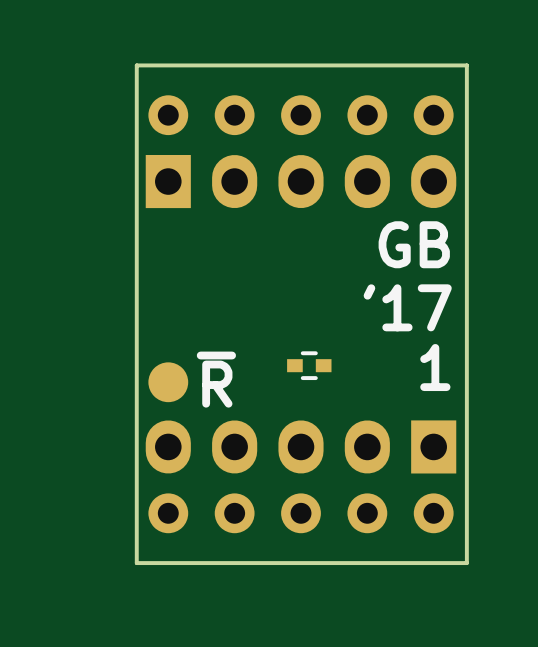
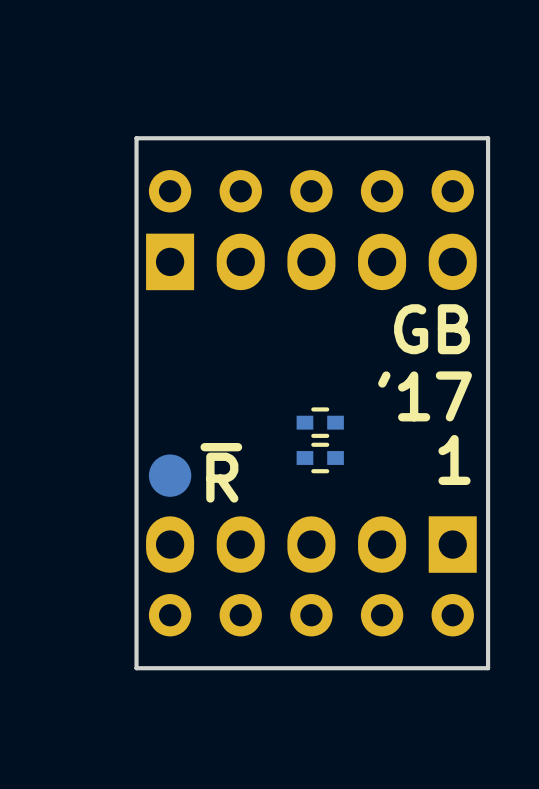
part: none -> (320, 422)

